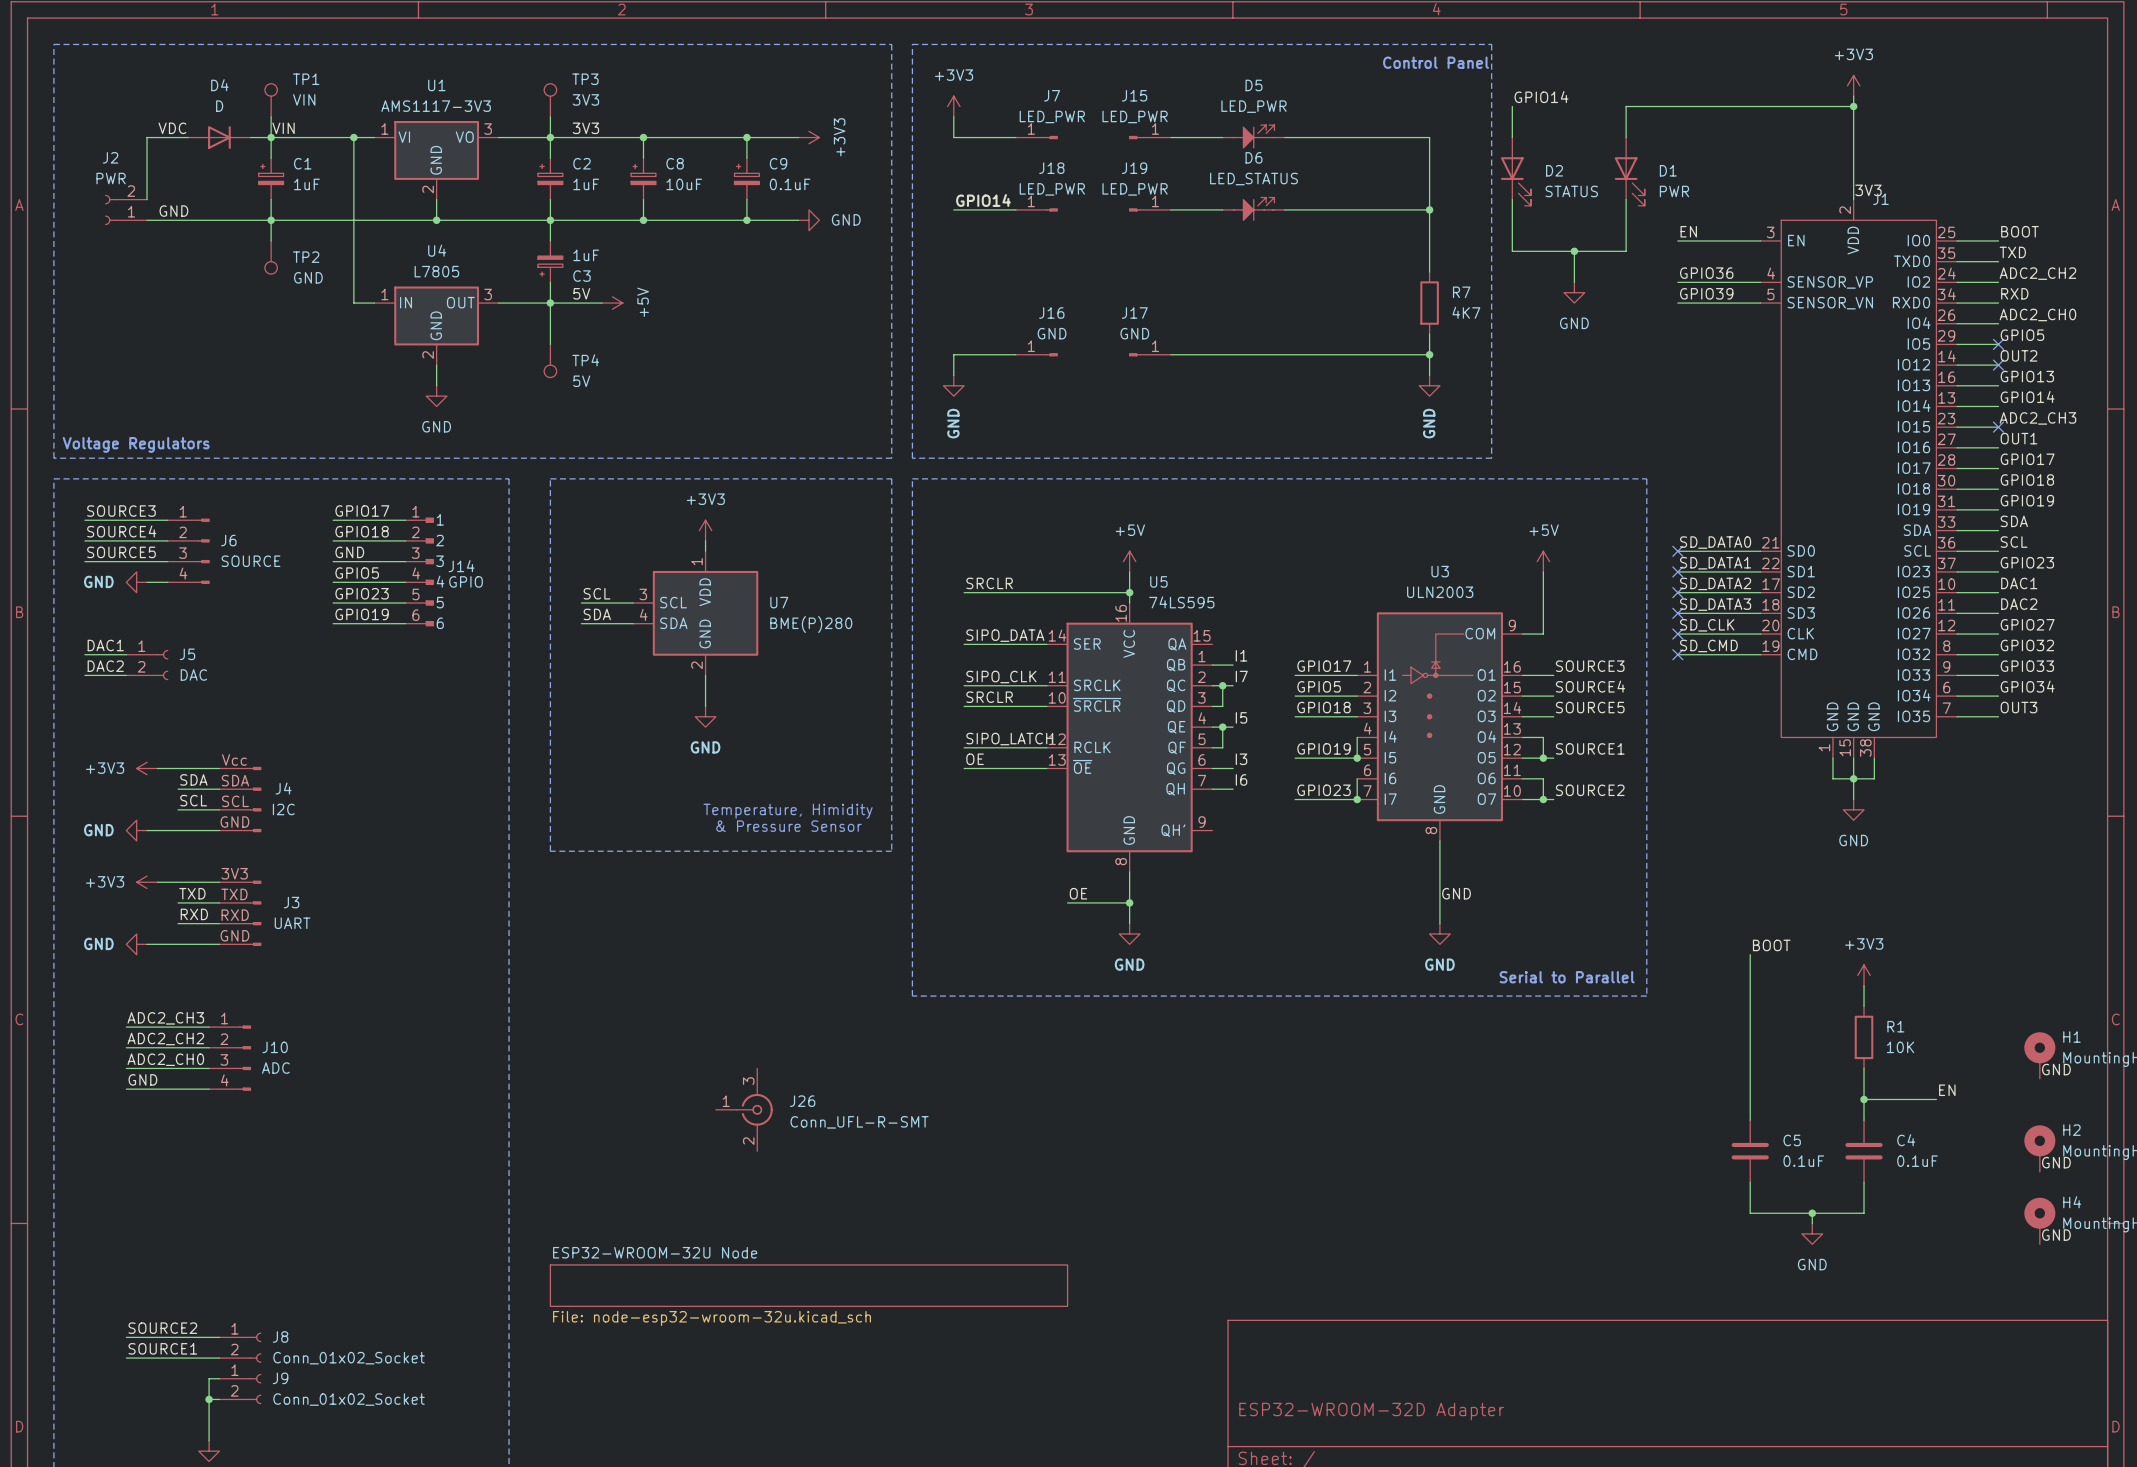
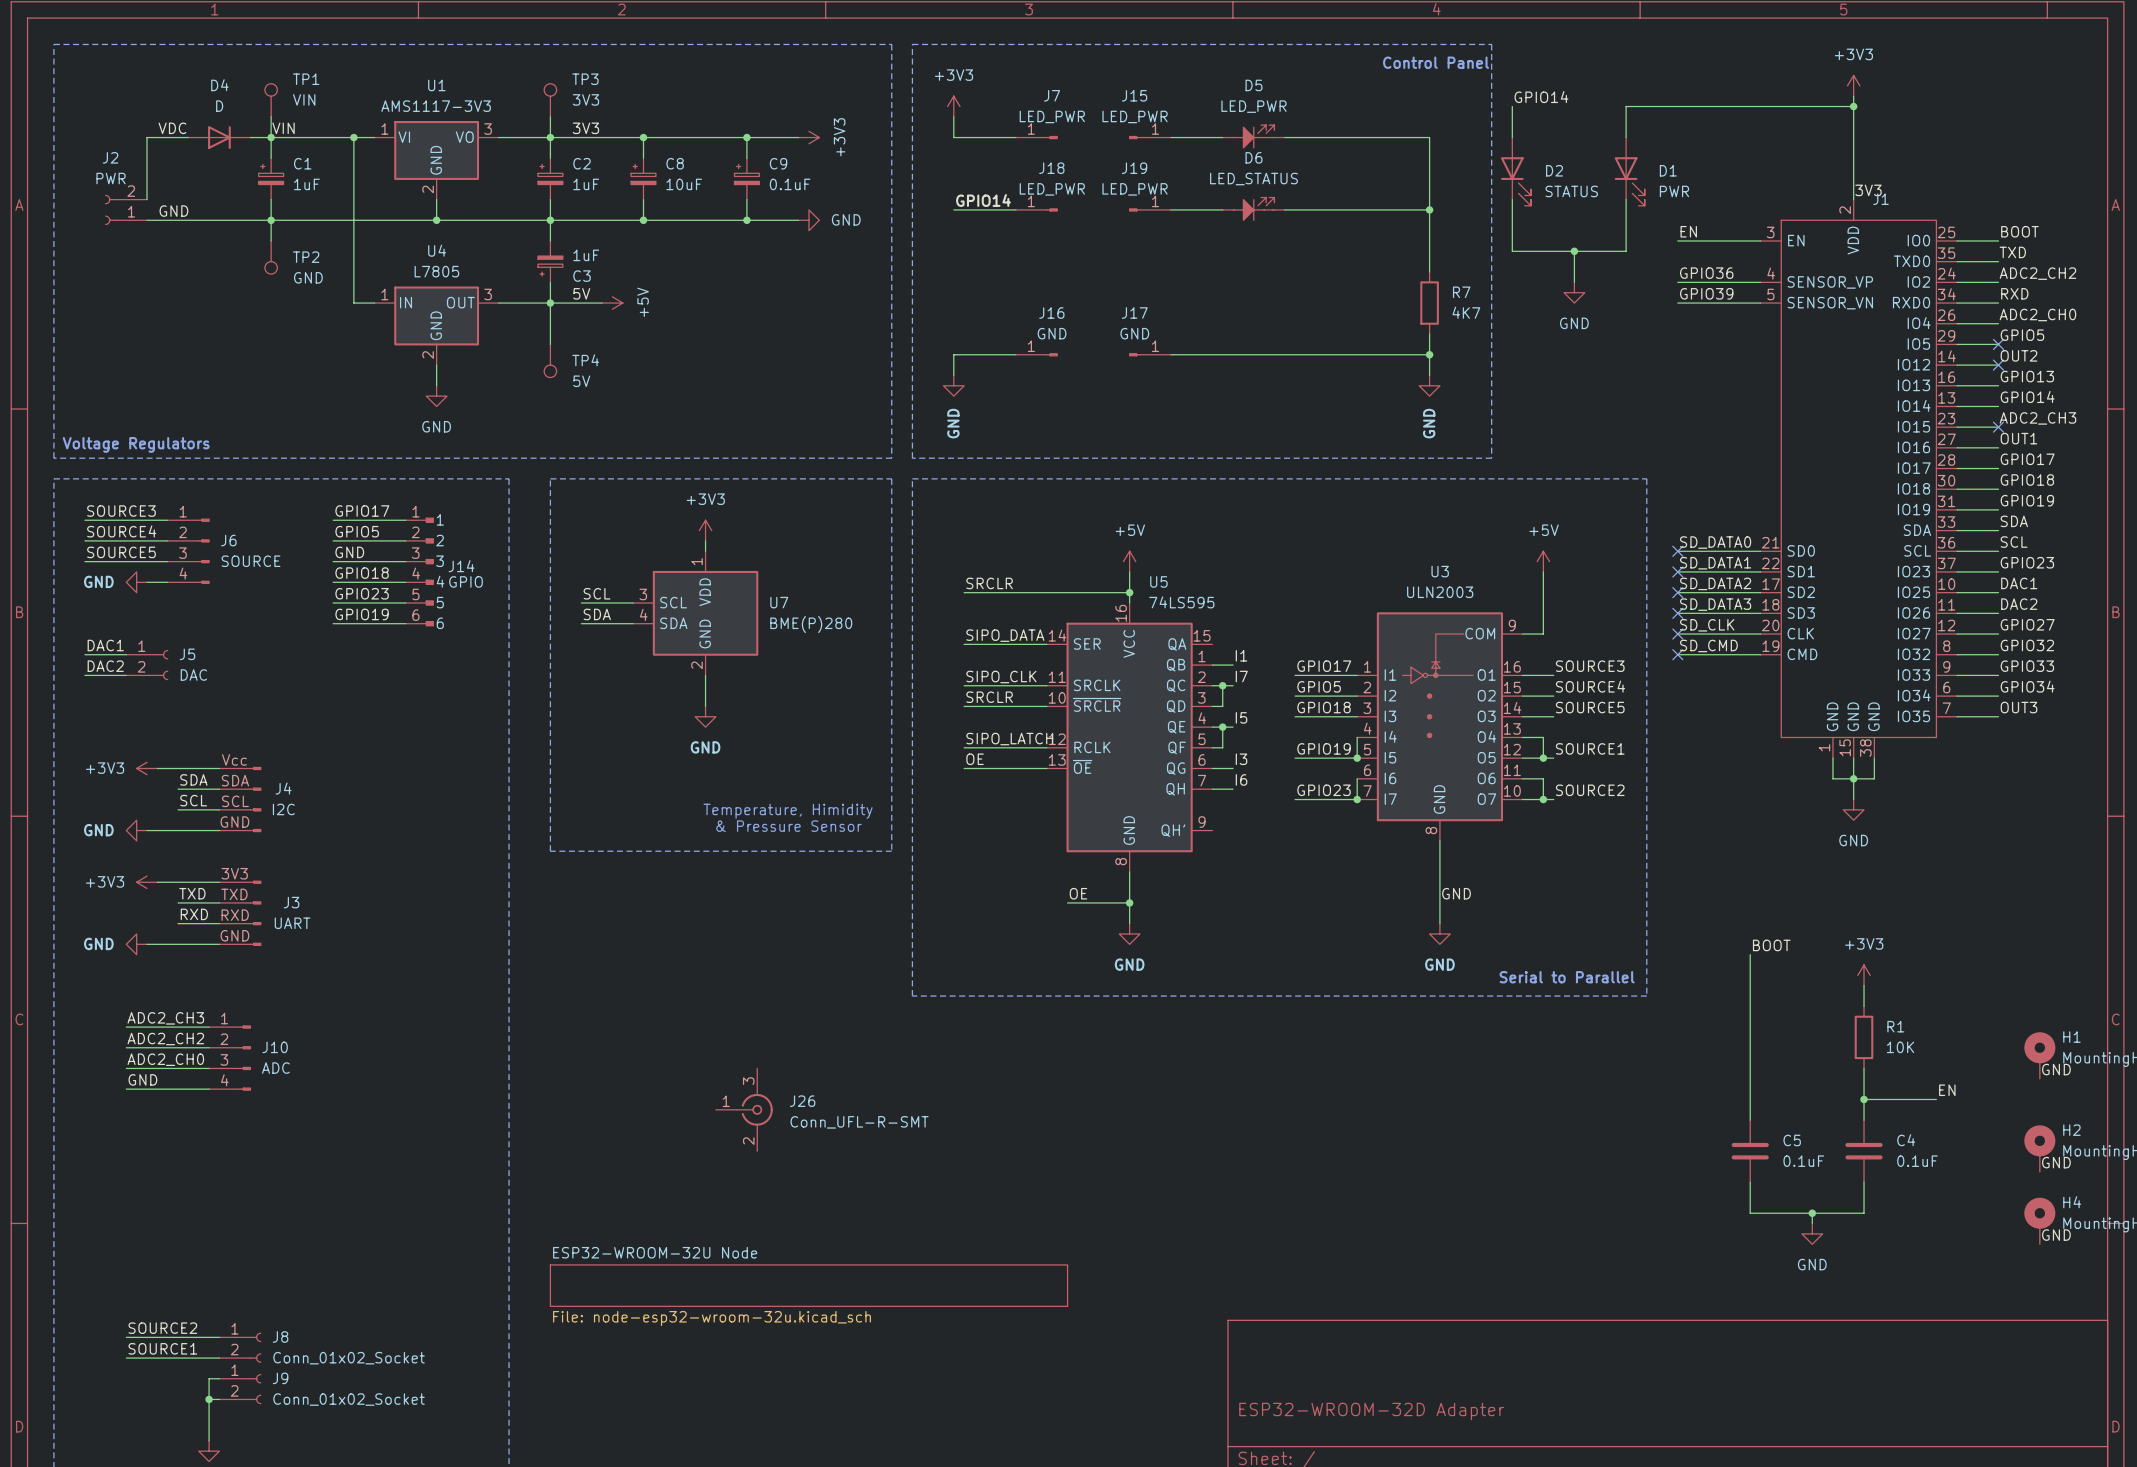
label: GPIO18 (362, 531) -> GPIO5 (357, 531)
label: GPIO5 (357, 573) -> GPIO18 (362, 573)

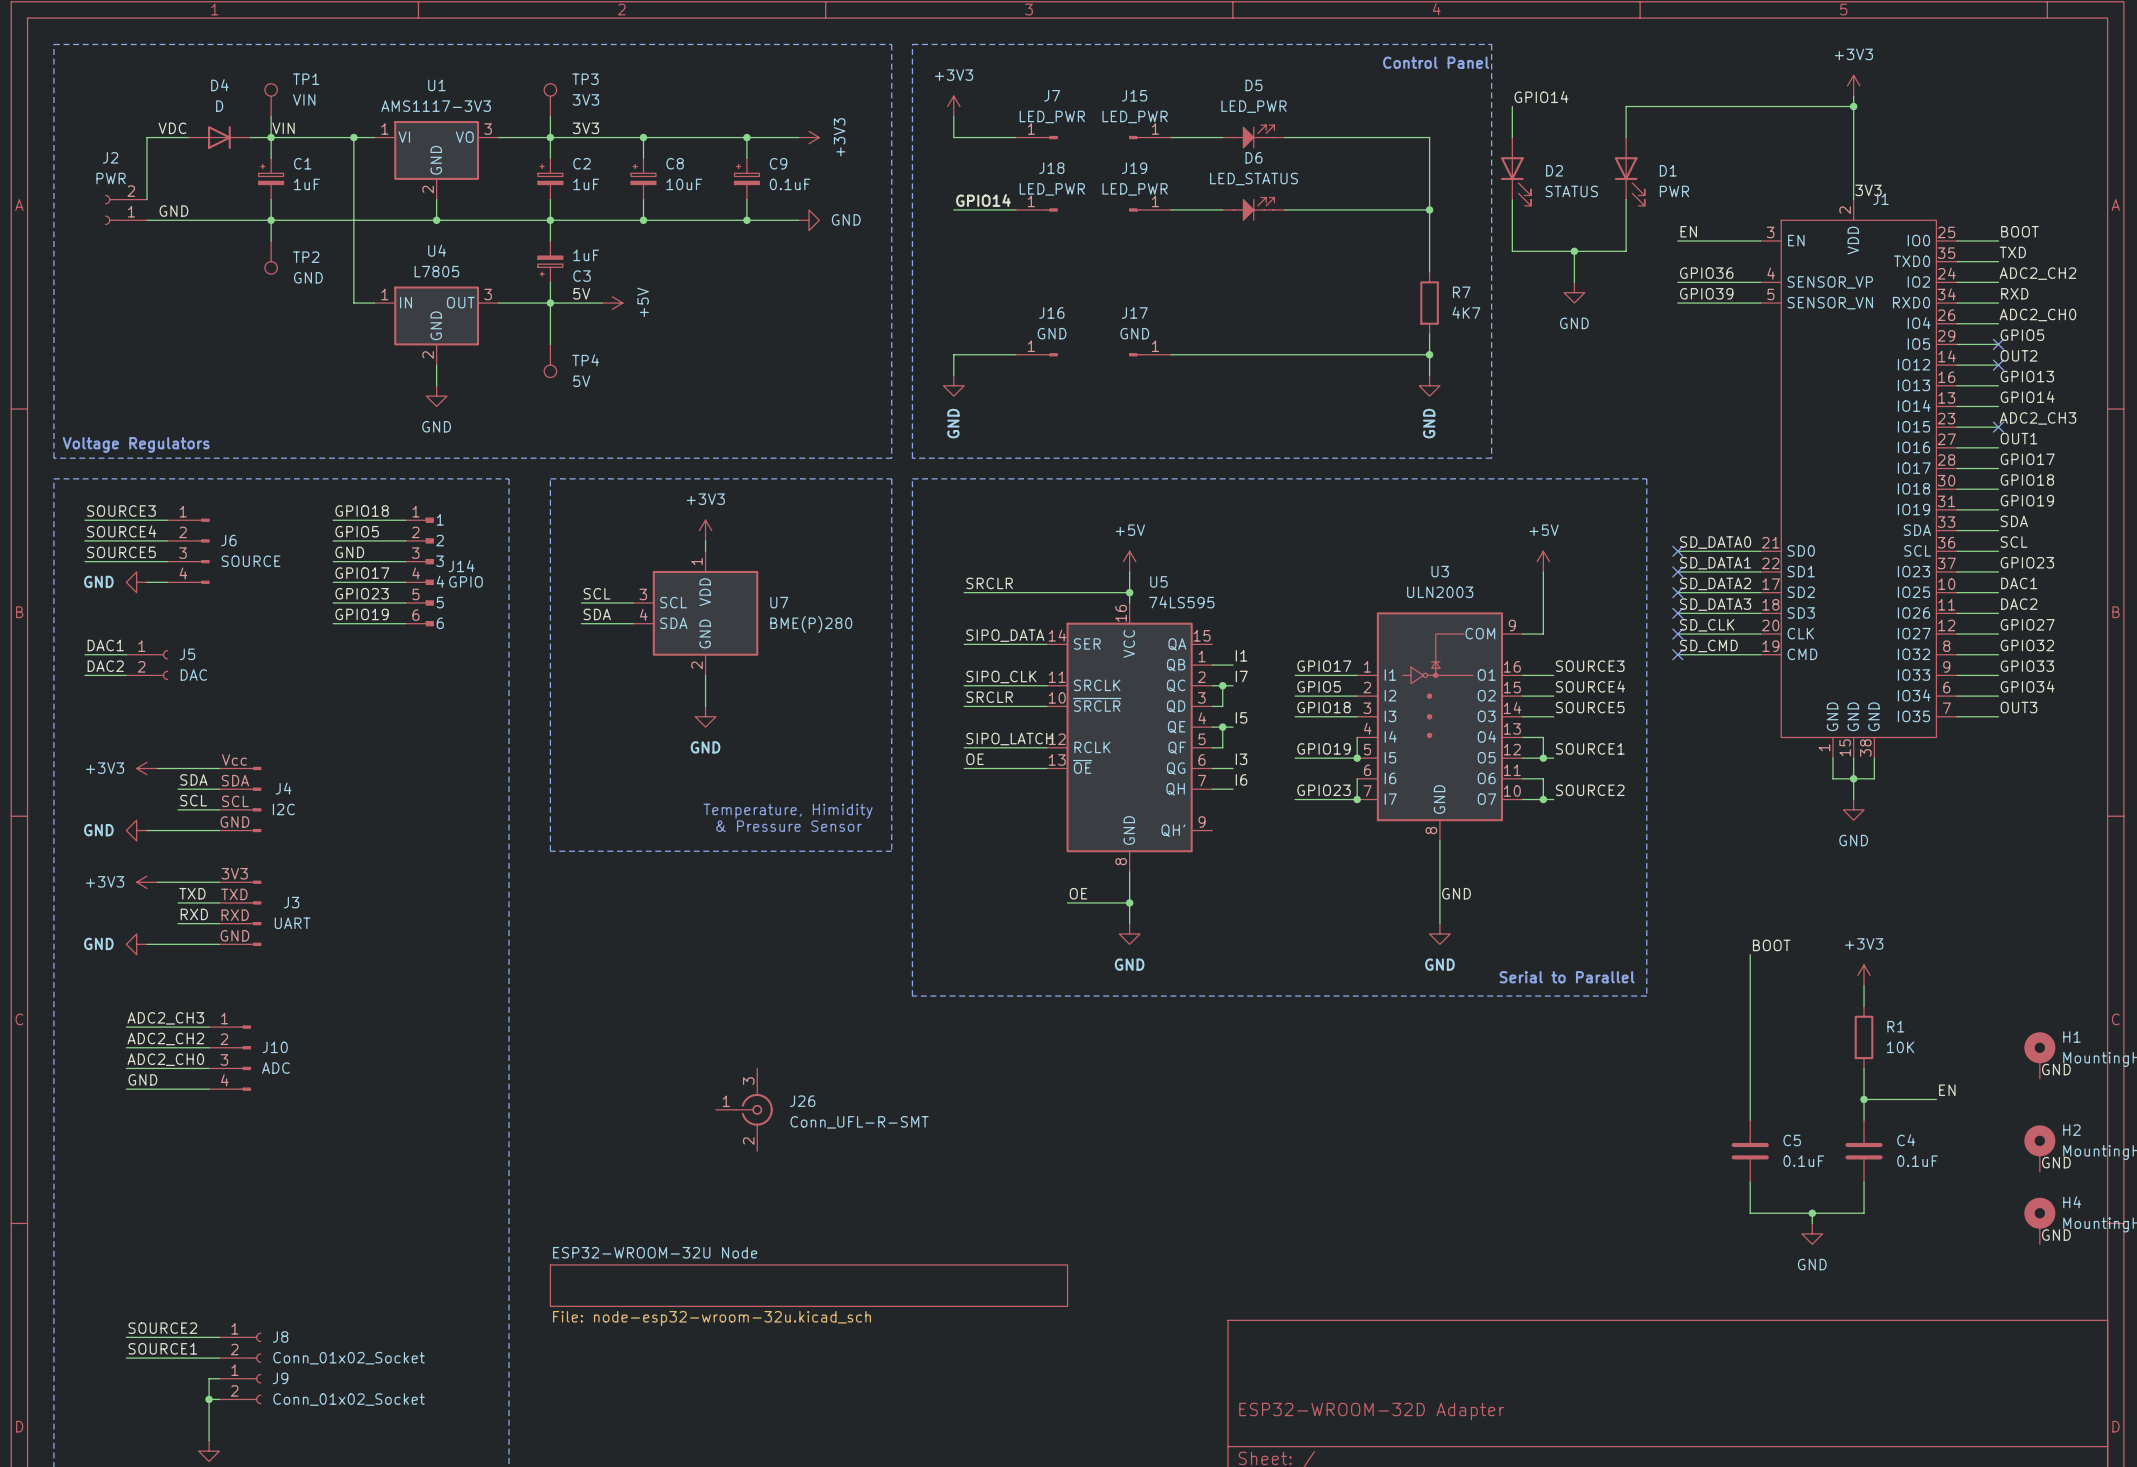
label: GPIO17 (362, 511) -> GPIO18 (362, 511)
label: GPIO18 (362, 573) -> GPIO17 (362, 573)

